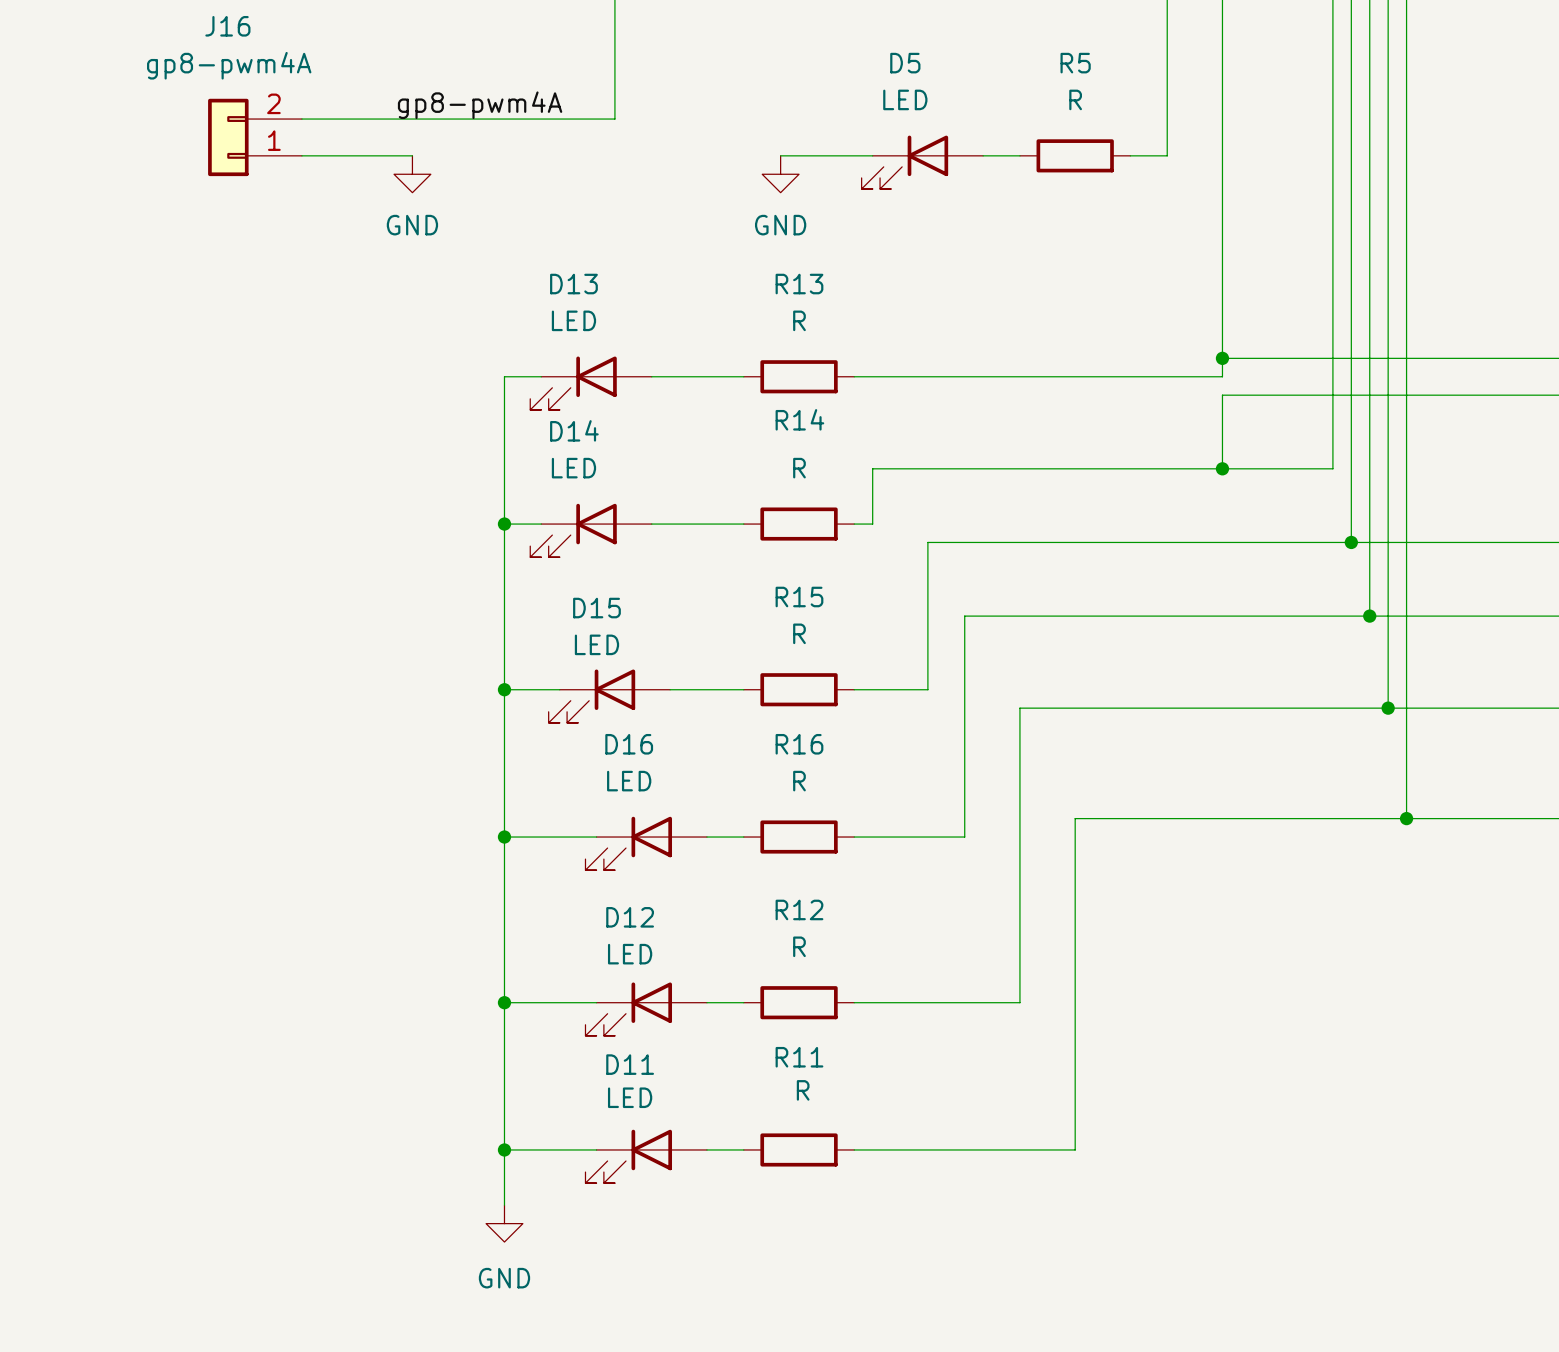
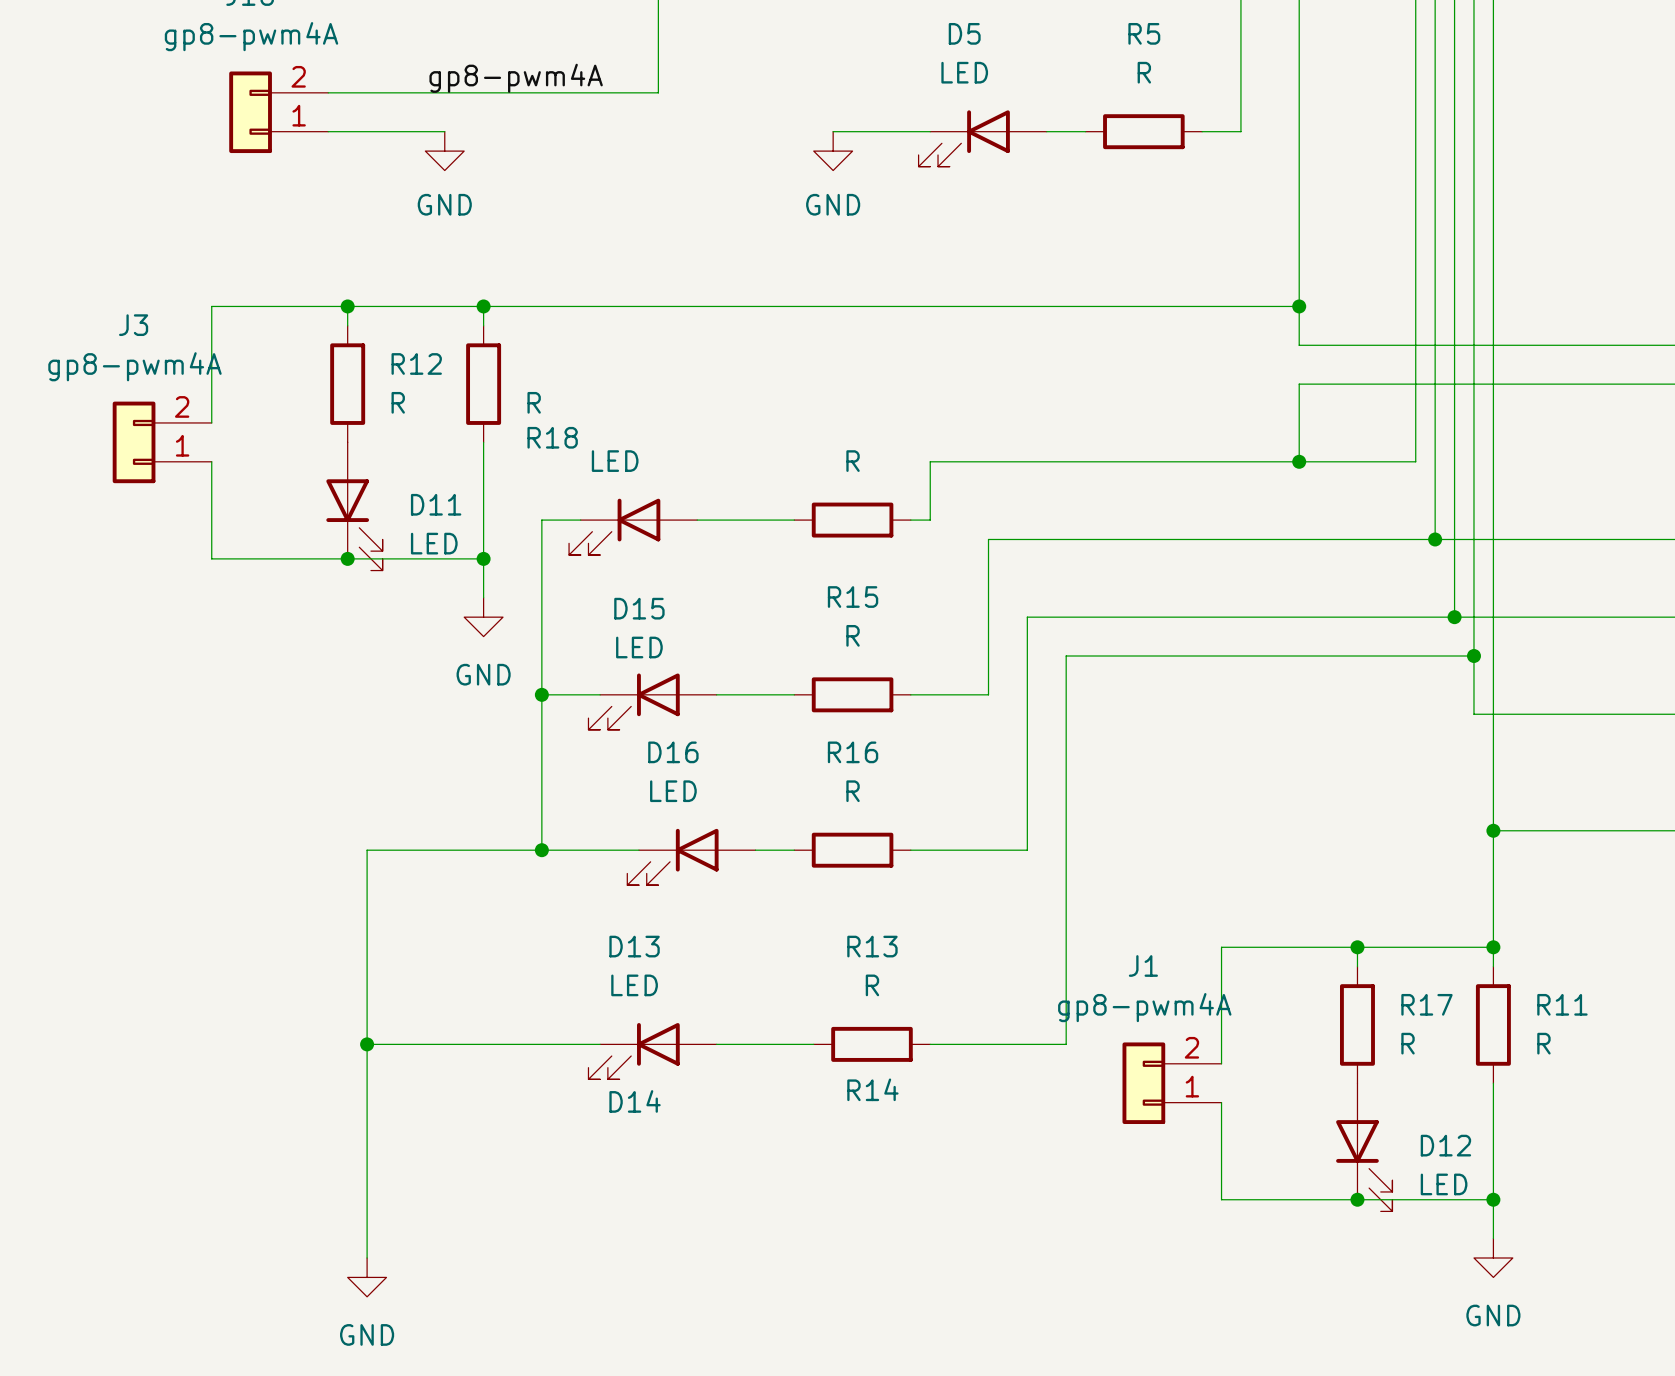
wire: none -> (347, 306) (347, 325)
junction: none -> (347, 306)
wire: none -> (483, 306) (483, 325)
junction: none -> (483, 306)
wire: none -> (1299, 306) (211, 306) (211, 422)
wire: (1222, 358) (1222, 376) (854, 376) -> none
junction position: (1222, 358) -> (1299, 306)
wire: (541, 376) (504, 376) (504, 524) -> none
wire: (651, 376) (743, 376) -> none
R13 position: (799, 376) -> (871, 1044)
D13 position: (591, 383) -> (652, 1051)
R18: none -> R (483, 384)
R14 name position: R14 (799, 419) -> R14 (872, 1089)
D14 name position: D14 (574, 430) -> D14 (635, 1101)
J3: none -> gp8-pwm4A (162, 442)
wire: none -> (483, 442) (483, 597)
wire: none -> (211, 461) (211, 558) (483, 558)
junction position: (504, 524) -> (483, 558)
junction: none -> (347, 558)
power symbol: none -> GND (483, 617)
wire: none -> (1473, 656) (1066, 656) (1066, 1044) (930, 1044)
wire: (1388, 708) (1019, 708) (1019, 1002) (854, 1002) -> none
junction position: (1388, 708) -> (1473, 656)
wire: (1406, 818) (1075, 818) (1075, 1149) (854, 1149) -> (1493, 830) (1493, 966)
wire: (504, 837) (504, 1205) -> (541, 850) (367, 850) (367, 1257)
R12 name position: R12 (799, 909) -> R12 (416, 363)
D12 name position: D12 (630, 917) -> D12 (1445, 1145)
wire: none -> (1357, 947) (1357, 966)
junction: none -> (1357, 947)
wire: none -> (1493, 947) (1221, 947) (1221, 1063)
junction: none -> (1493, 947)
D12 value position: LED (630, 954) -> LED (1444, 1184)
wire: (504, 1002) (596, 1002) -> (716, 1044) (813, 1044)
junction: (504, 1002) -> none
wire: (706, 1002) (743, 1002) -> none
R12 rotation: 0° (799, 1002) -> 90° clockwise (347, 384)
R12 position: (799, 1002) -> (347, 384)
R17: none -> R (1357, 1024)
D12 rotation: 0° (628, 1009) -> 90° counterclockwise (1364, 1165)
D12 position: (646, 1009) -> (1364, 1147)
wire: none -> (367, 1044) (600, 1044)
junction: none -> (367, 1044)
R11 name position: R11 (799, 1057) -> R11 (1562, 1004)
J1: none -> gp8-pwm4A (1172, 1083)
wire: none -> (1493, 1083) (1493, 1238)
D11 name position: D11 (630, 1064) -> D11 (436, 504)
wire: none -> (1221, 1102) (1221, 1199) (1493, 1199)
D11 value position: LED (630, 1097) -> LED (434, 543)
wire: (504, 1149) (596, 1149) -> none
junction: (504, 1149) -> none
wire: (706, 1149) (743, 1149) -> none
R11 rotation: 0° (799, 1149) -> 90° clockwise (1493, 1024)
R11 position: (799, 1149) -> (1493, 1024)
D11 rotation: 0° (628, 1156) -> 90° counterclockwise (354, 524)
D11 position: (646, 1156) -> (354, 506)
junction: none -> (1357, 1199)
junction: none -> (1493, 1199)
power symbol position: GND (504, 1223) -> GND (367, 1277)
power symbol: none -> GND (1493, 1257)

